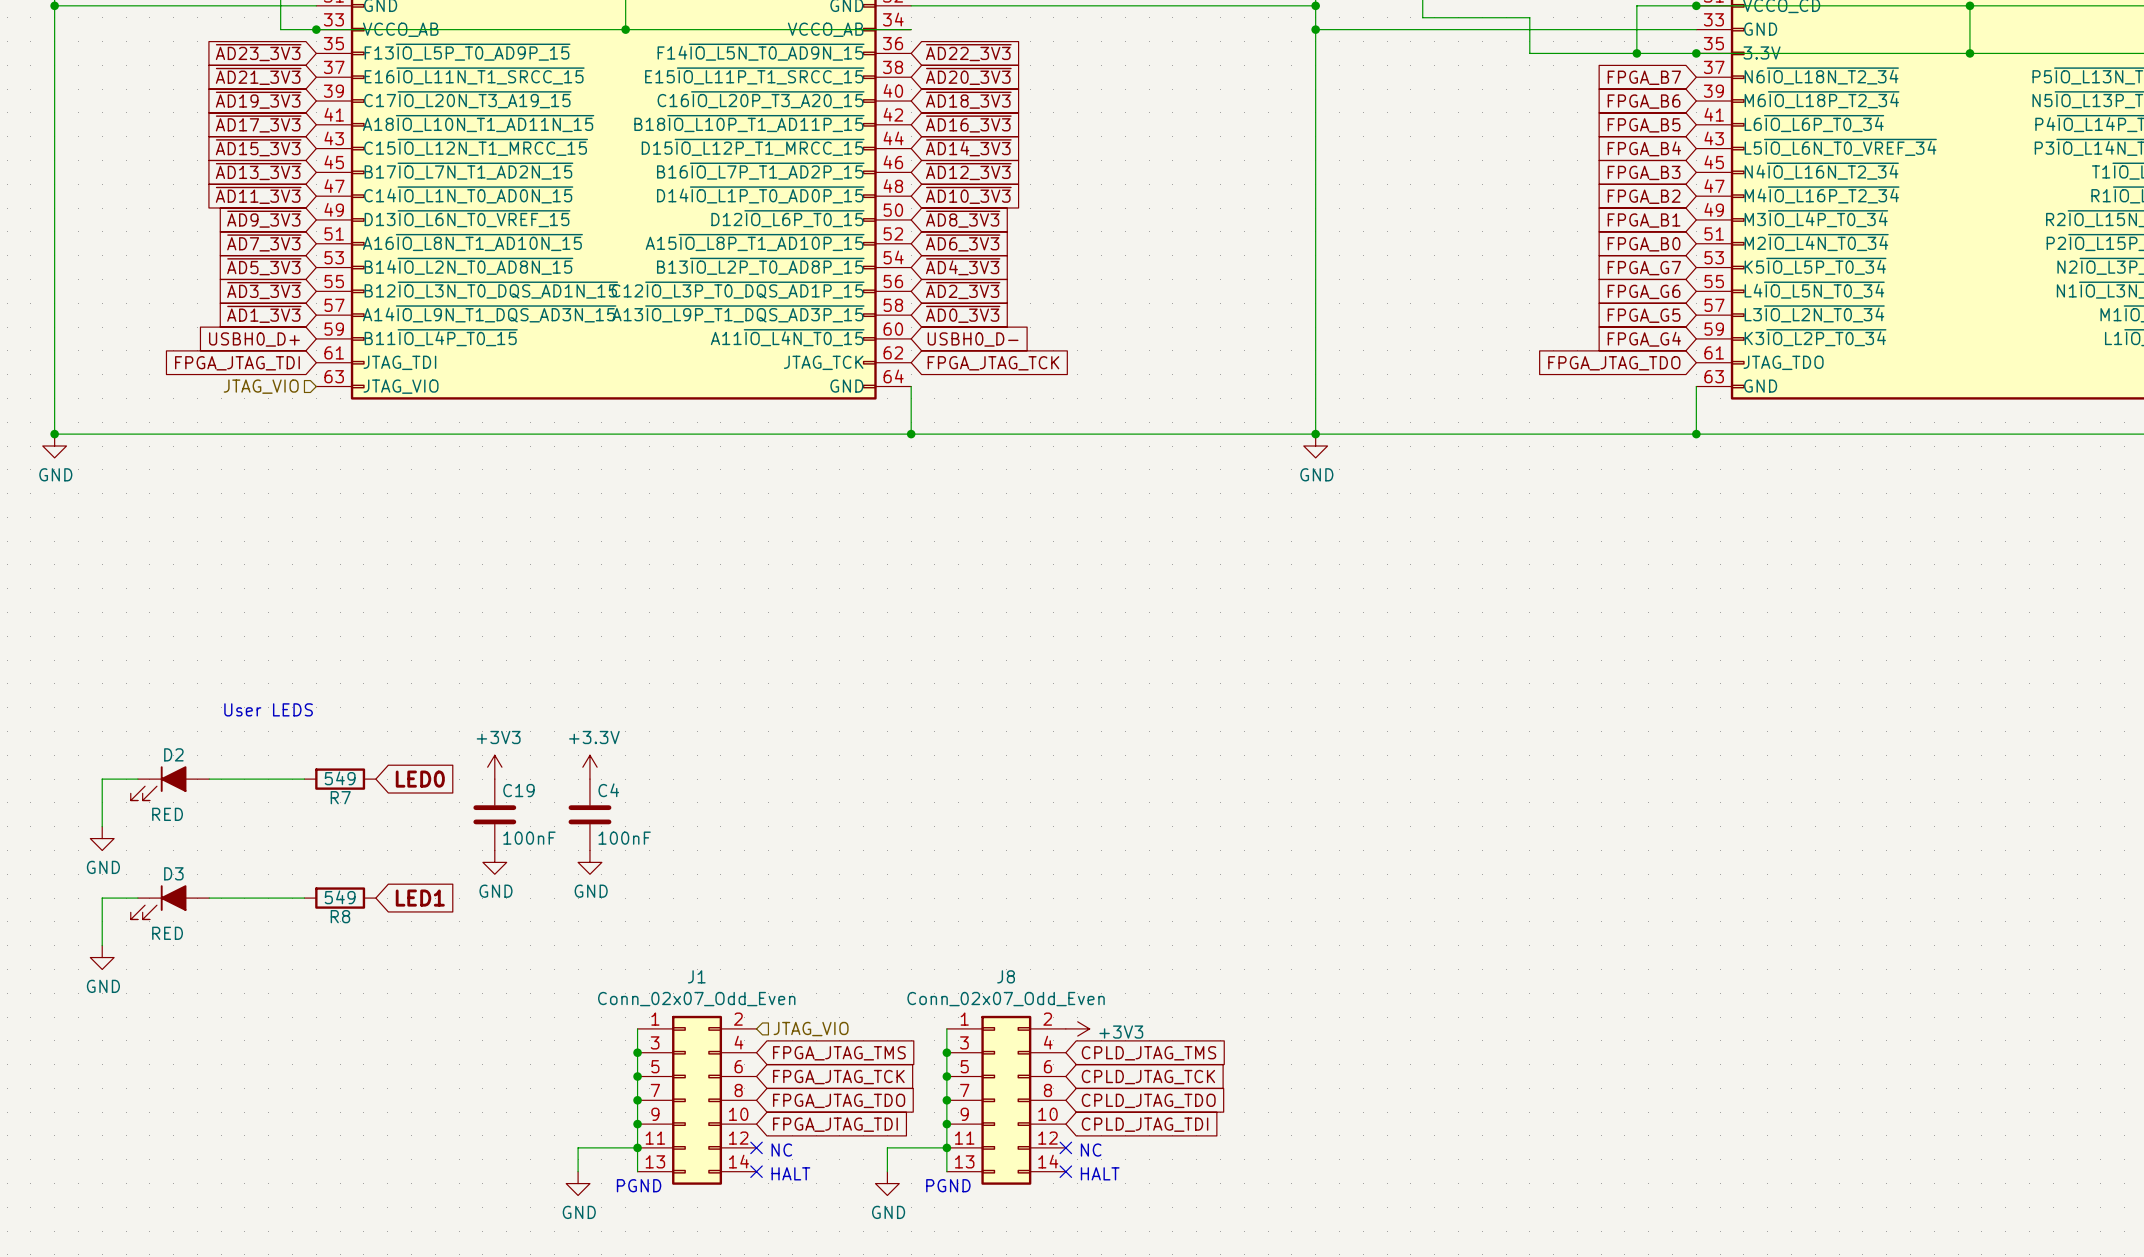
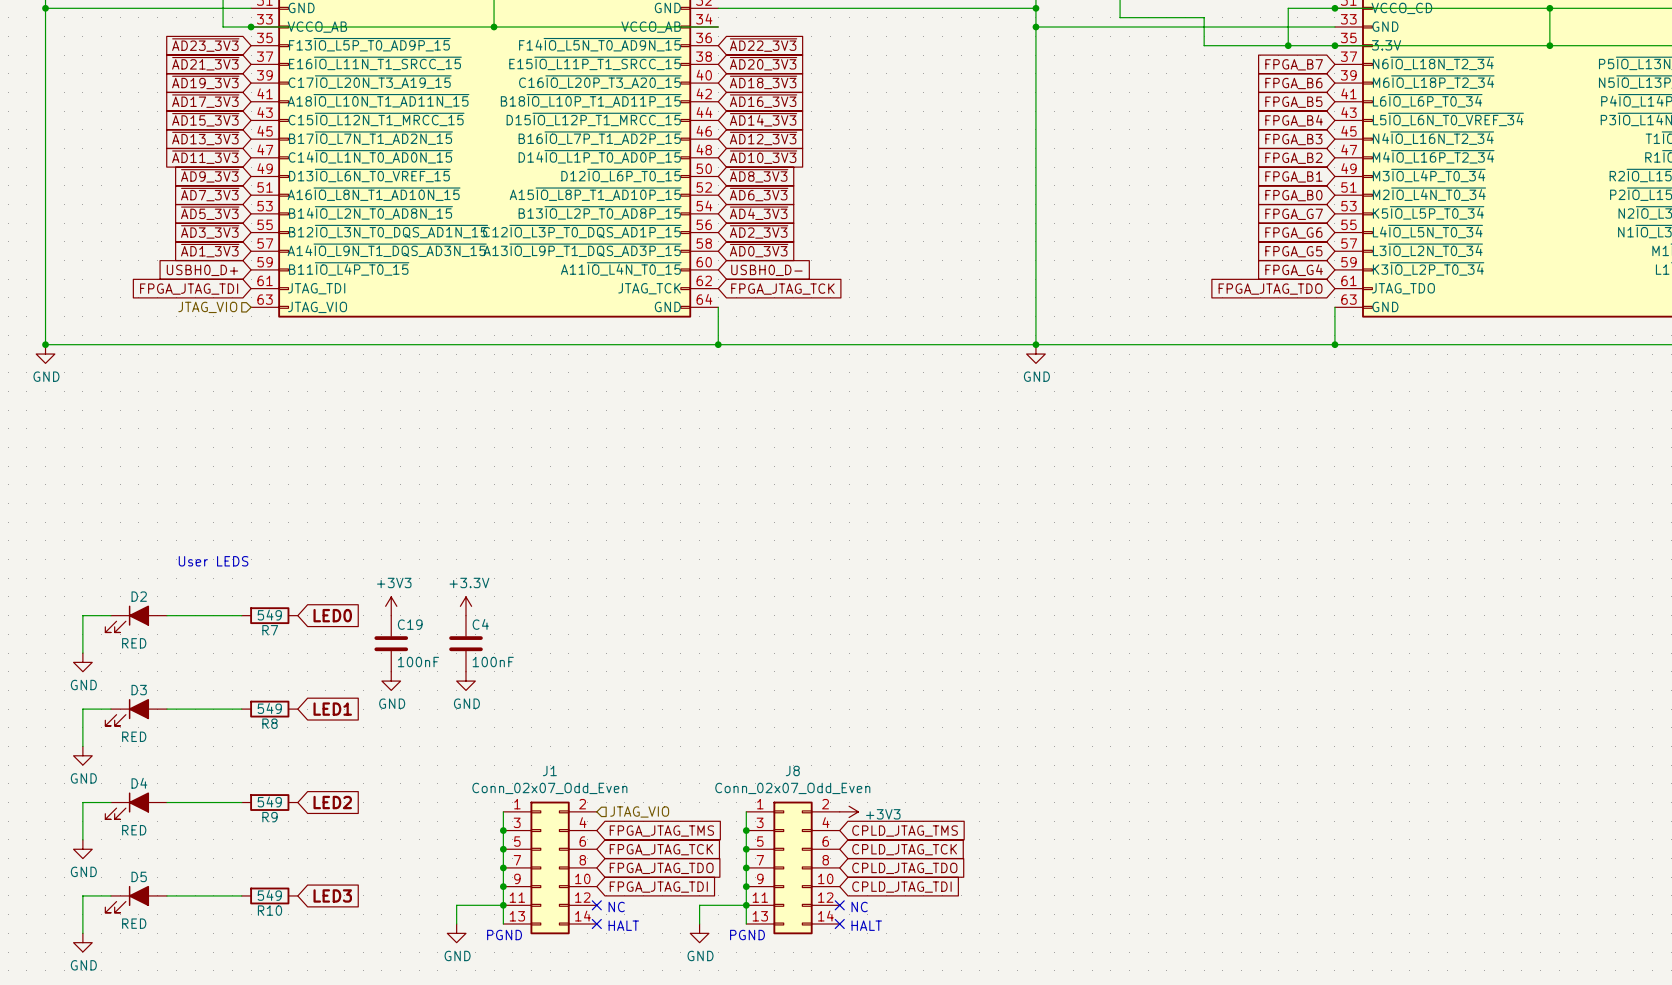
wire: none -> (110, 802) (82, 802) (82, 839)
wire: none -> (166, 802) (241, 802)
R9: none -> 549 (269, 802)
global label: none -> LED2 (332, 802)
D4: none -> RED (136, 805)
power symbol: none -> GND (82, 849)
wire: none -> (110, 895) (82, 895) (82, 933)
wire: none -> (166, 895) (241, 895)
R10: none -> 549 (269, 895)
global label: none -> LED3 (332, 895)
D5: none -> RED (136, 899)
power symbol: none -> GND (82, 942)

